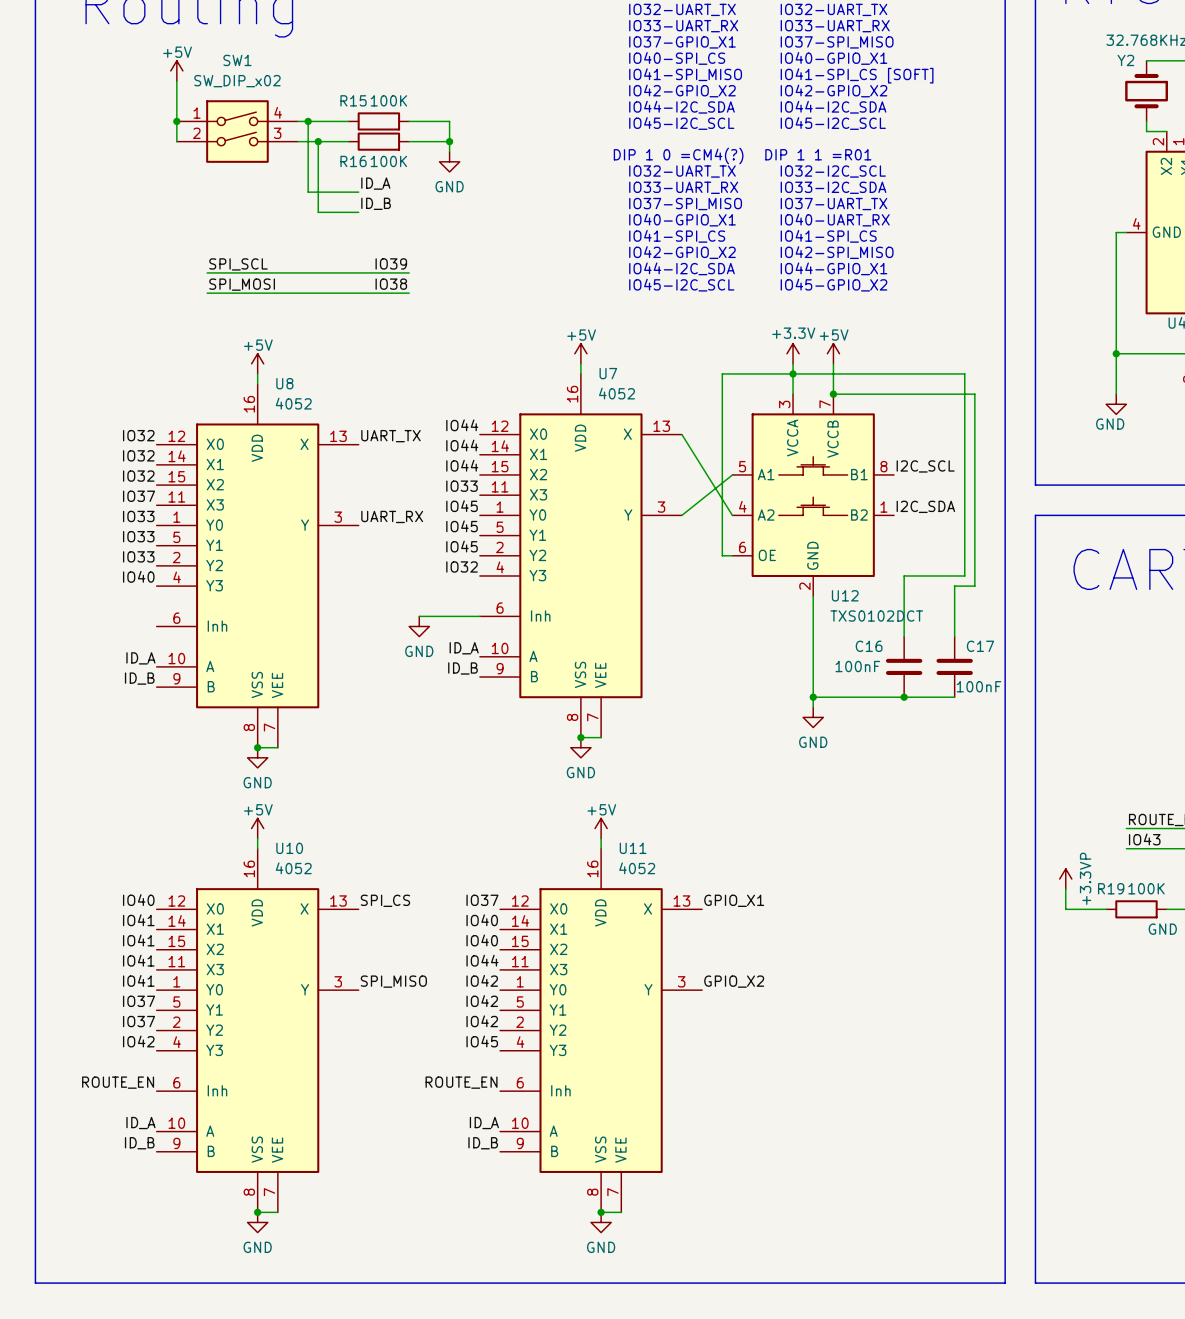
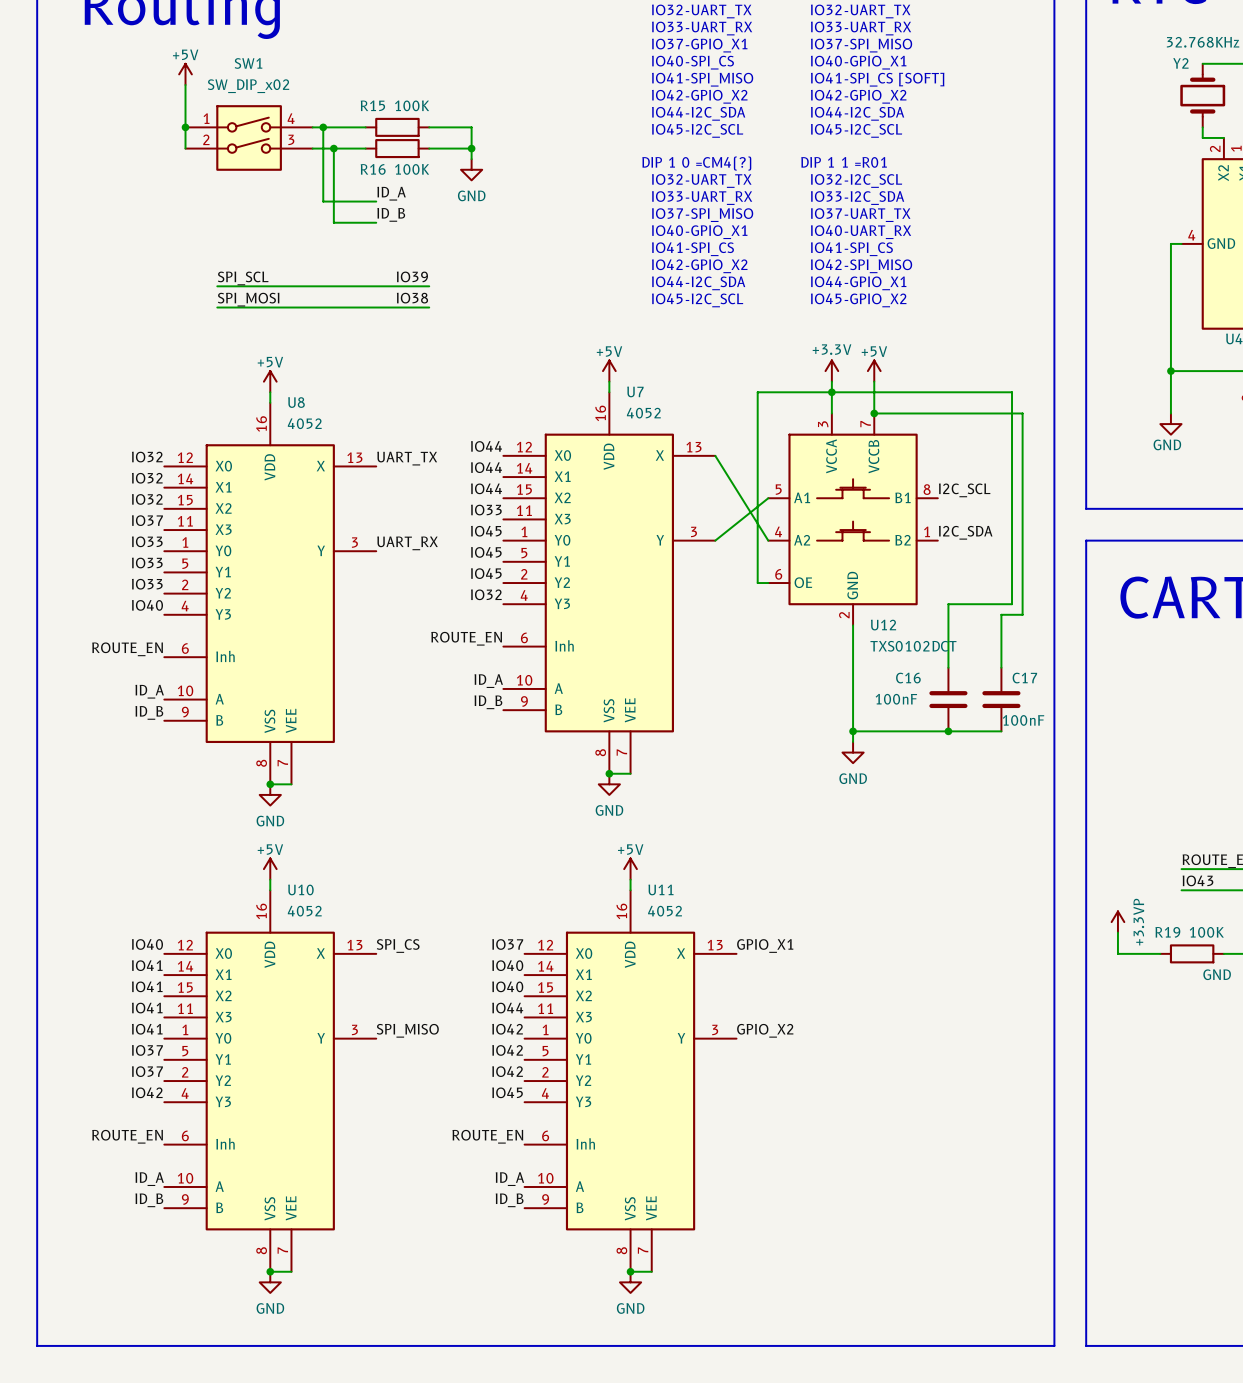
label: none -> ROUTE_EN (466, 638)
wire: (419, 616) (479, 616) -> none
label: none -> ROUTE_EN (127, 649)
power symbol: GND (419, 626) -> none

